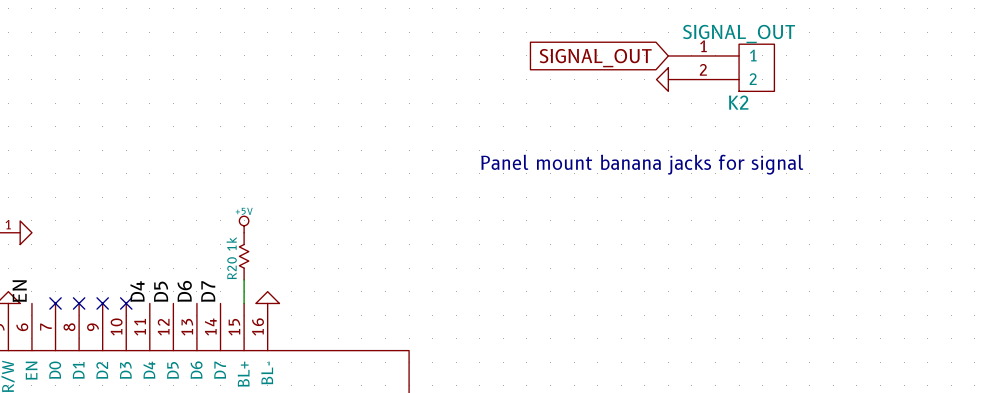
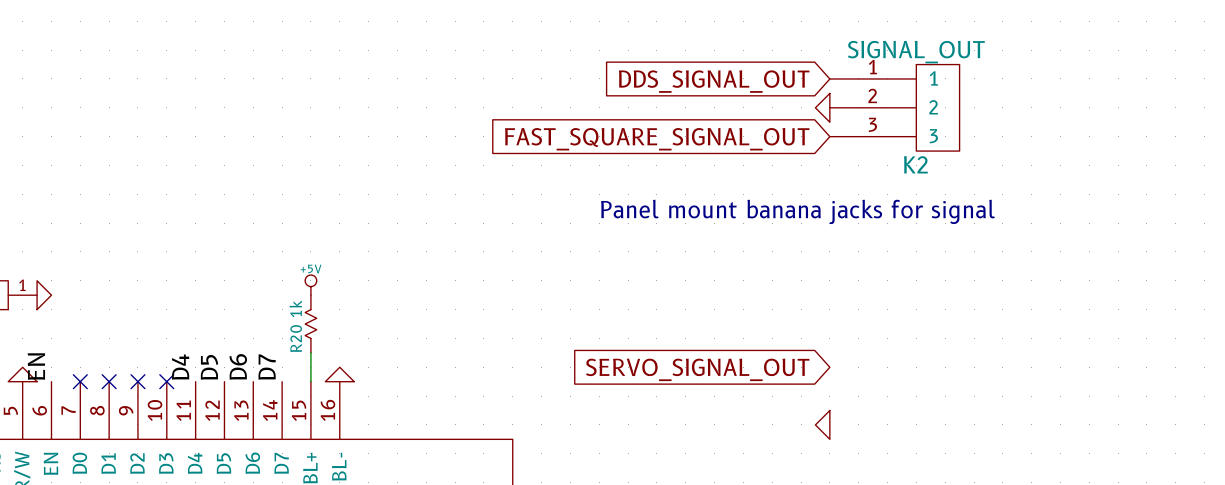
K2 symbol: [668, 44, 775, 92] -> [829, 64, 960, 152]
global label: SIGNAL_OUT (595, 58) -> DDS_SIGNAL_OUT (714, 81)
global label: none -> FAST_SQUARE_SIGNAL_OUT (657, 139)
global label: none -> SERVO_SIGNAL_OUT (697, 369)
power symbol: none -> (822, 424)

